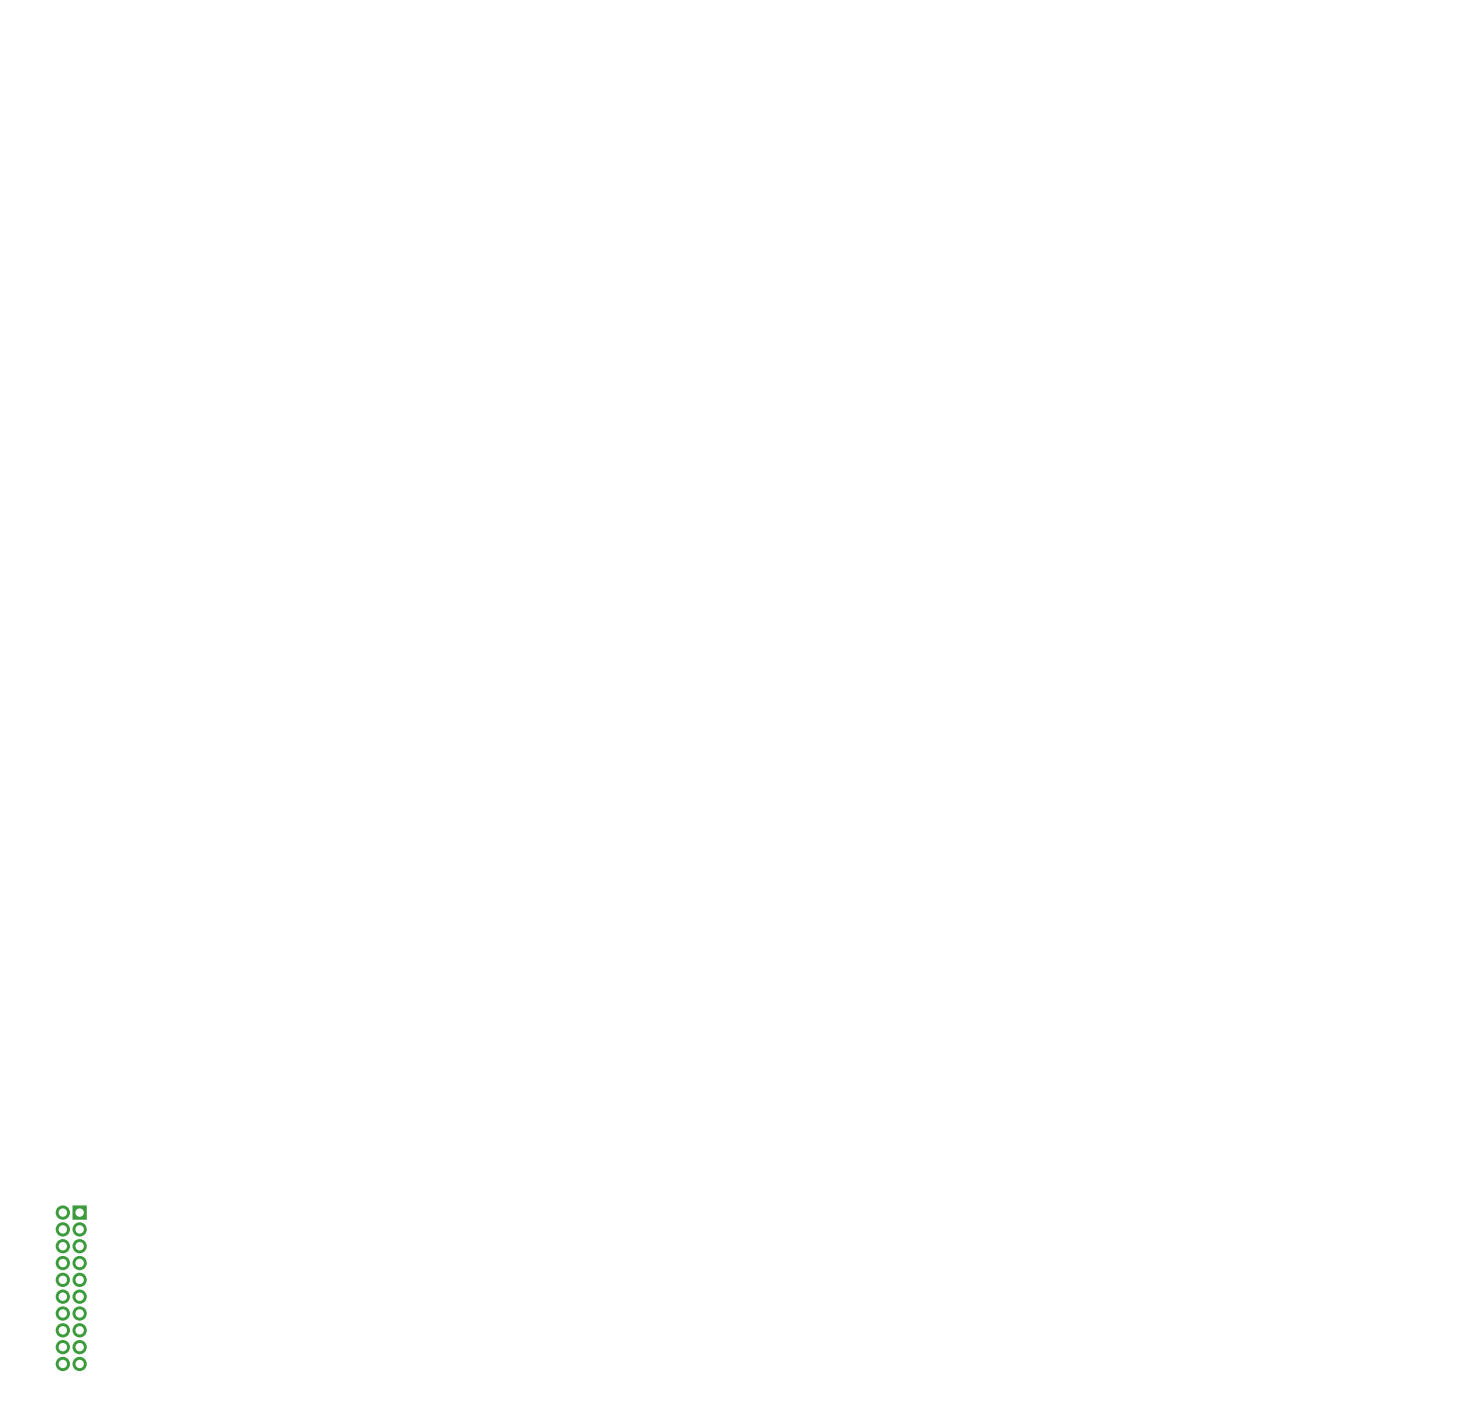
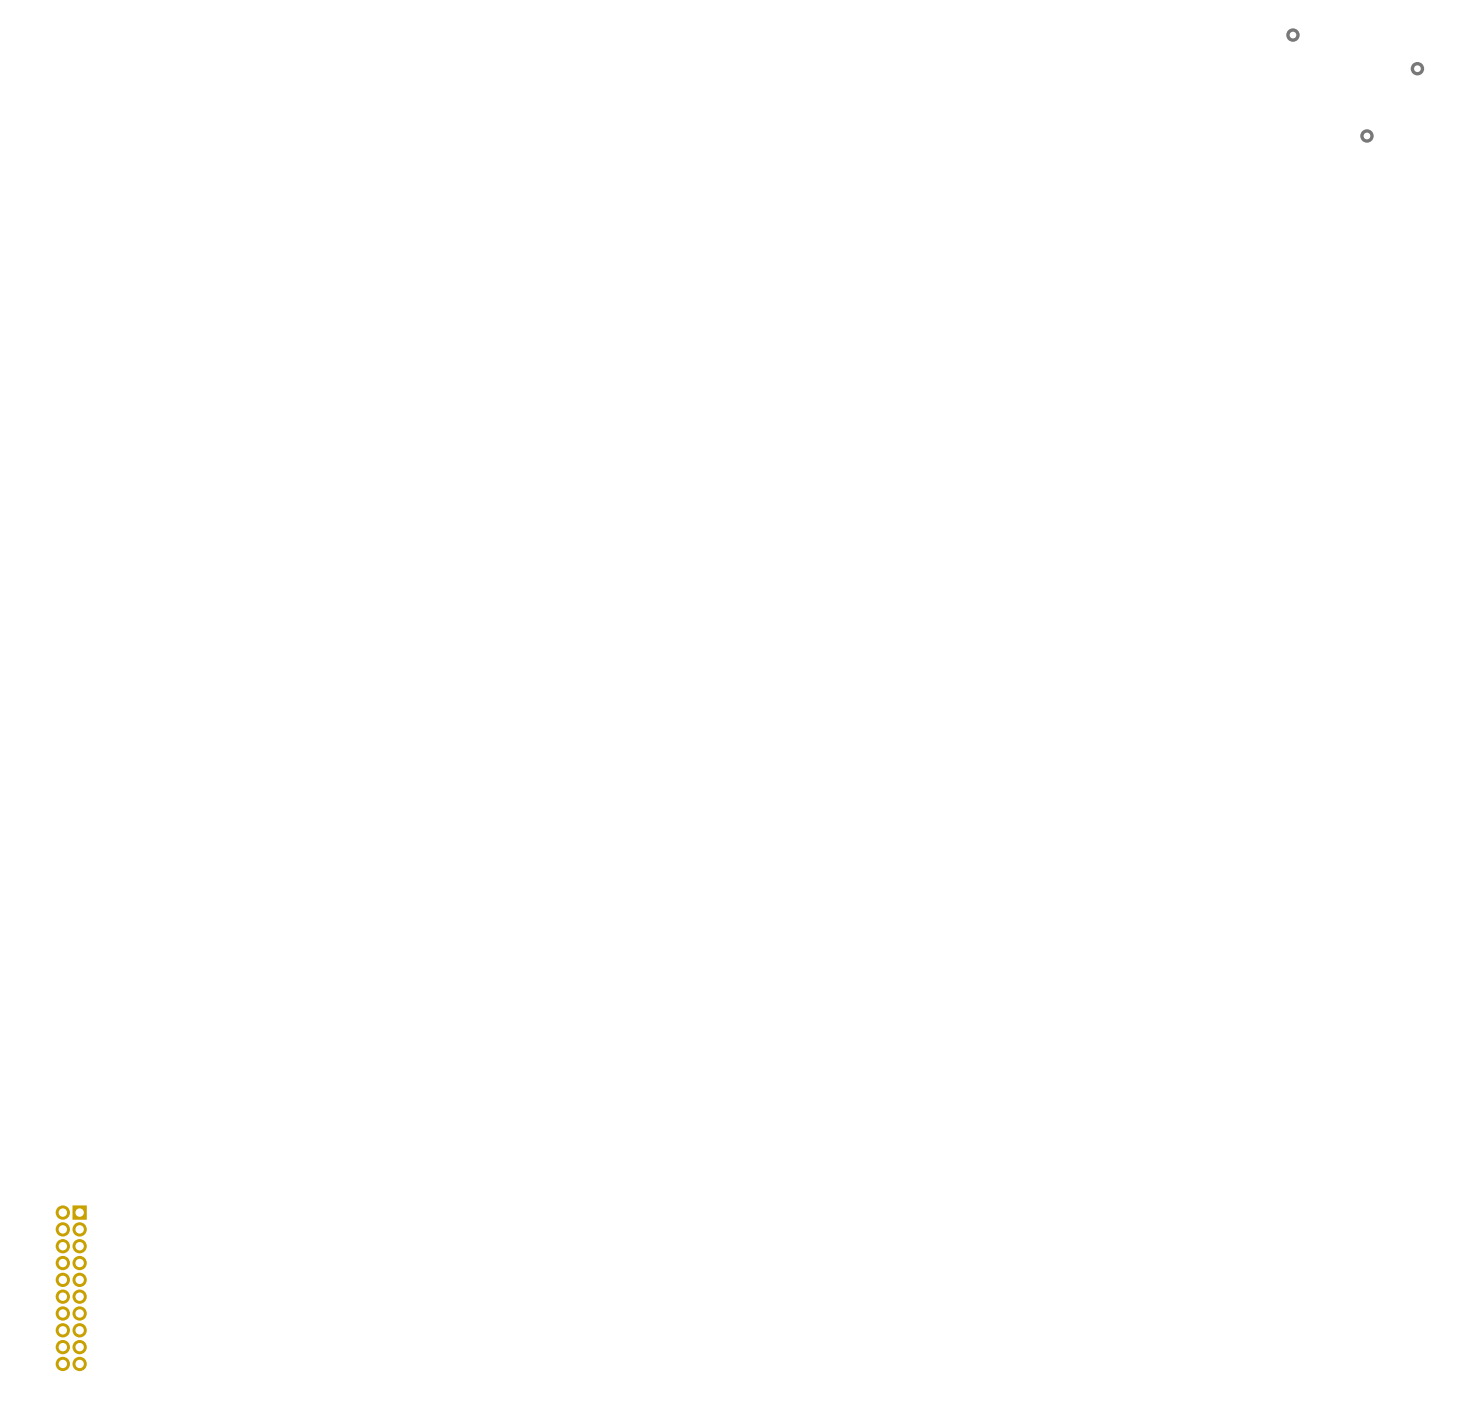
via: none -> (1292, 35)
via: none -> (1417, 68)
via: none -> (1366, 135)

